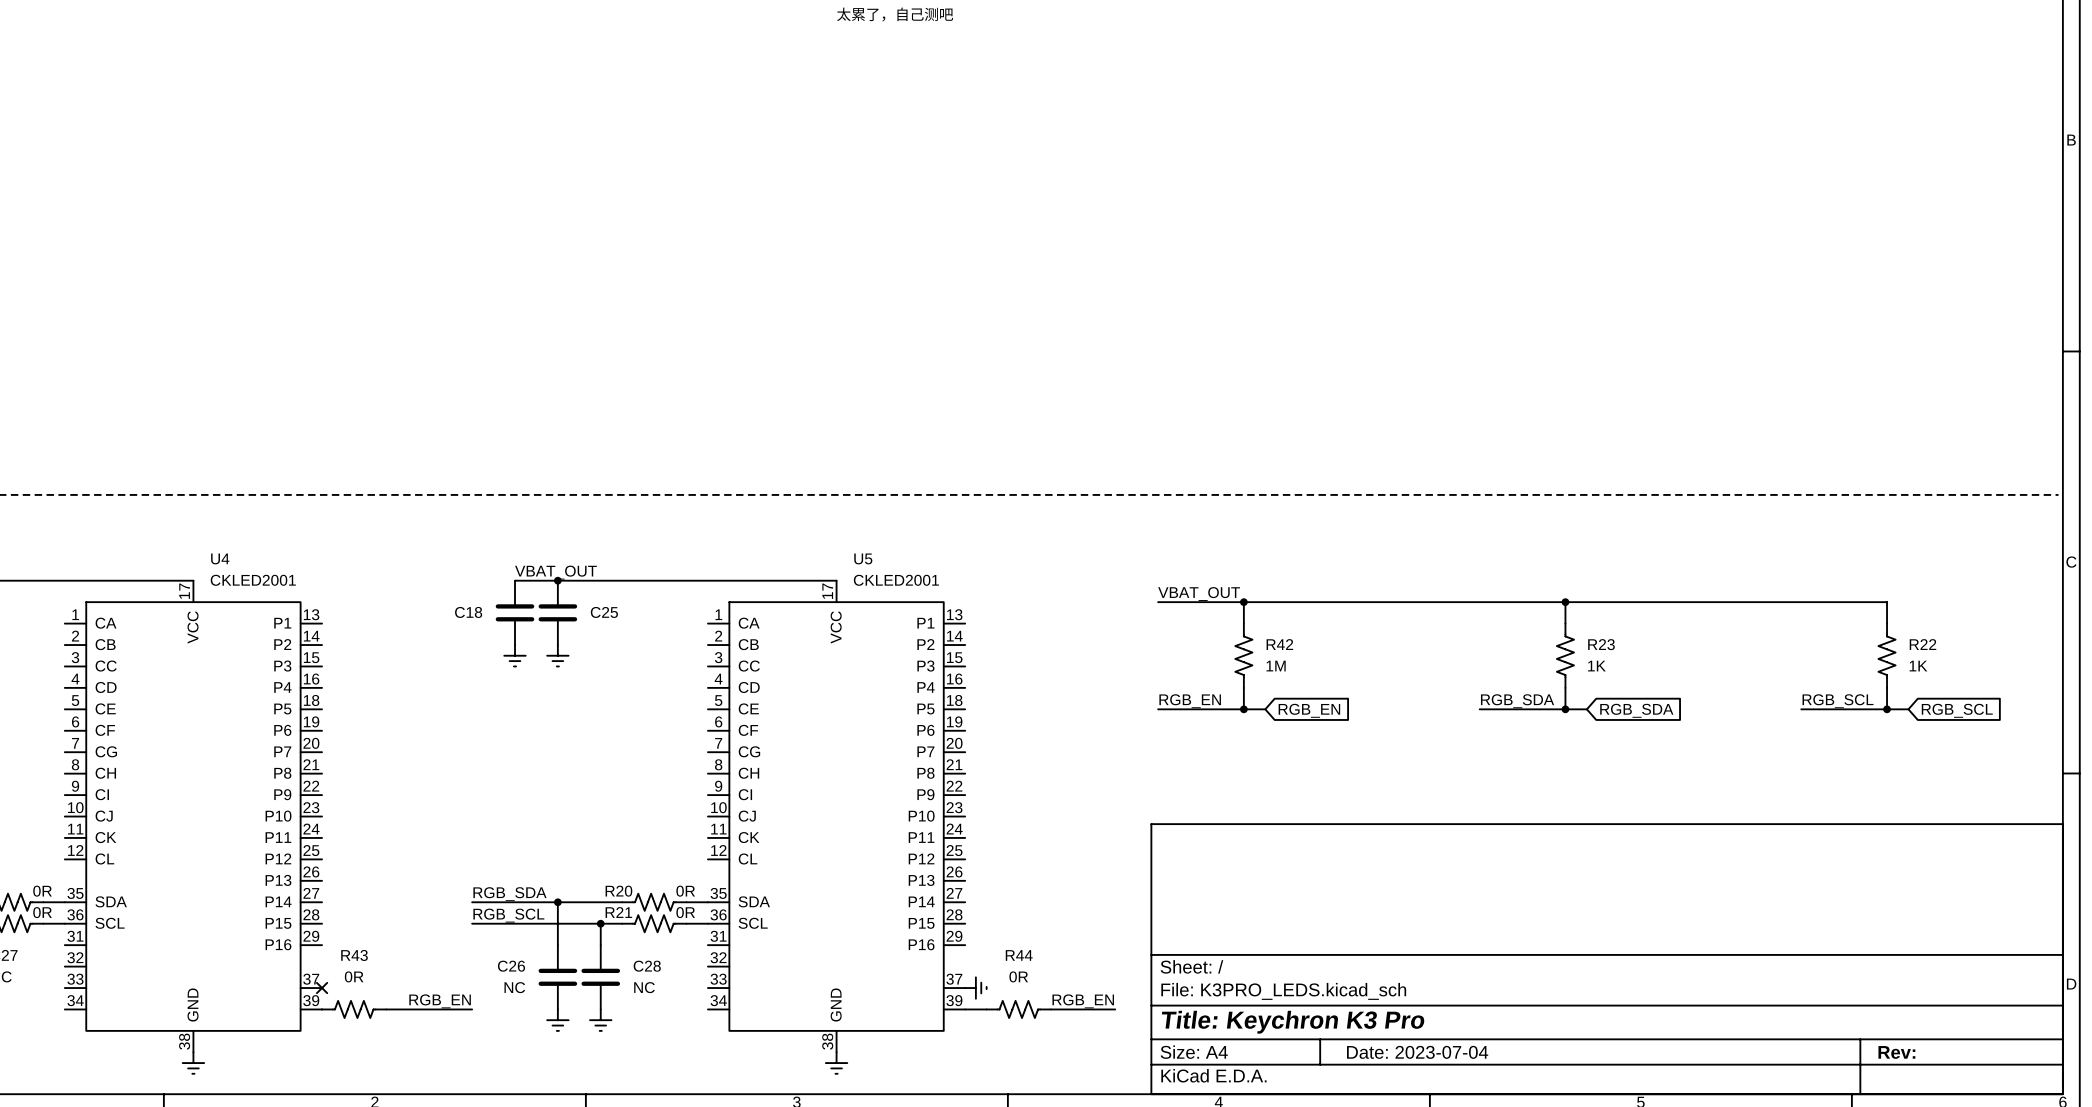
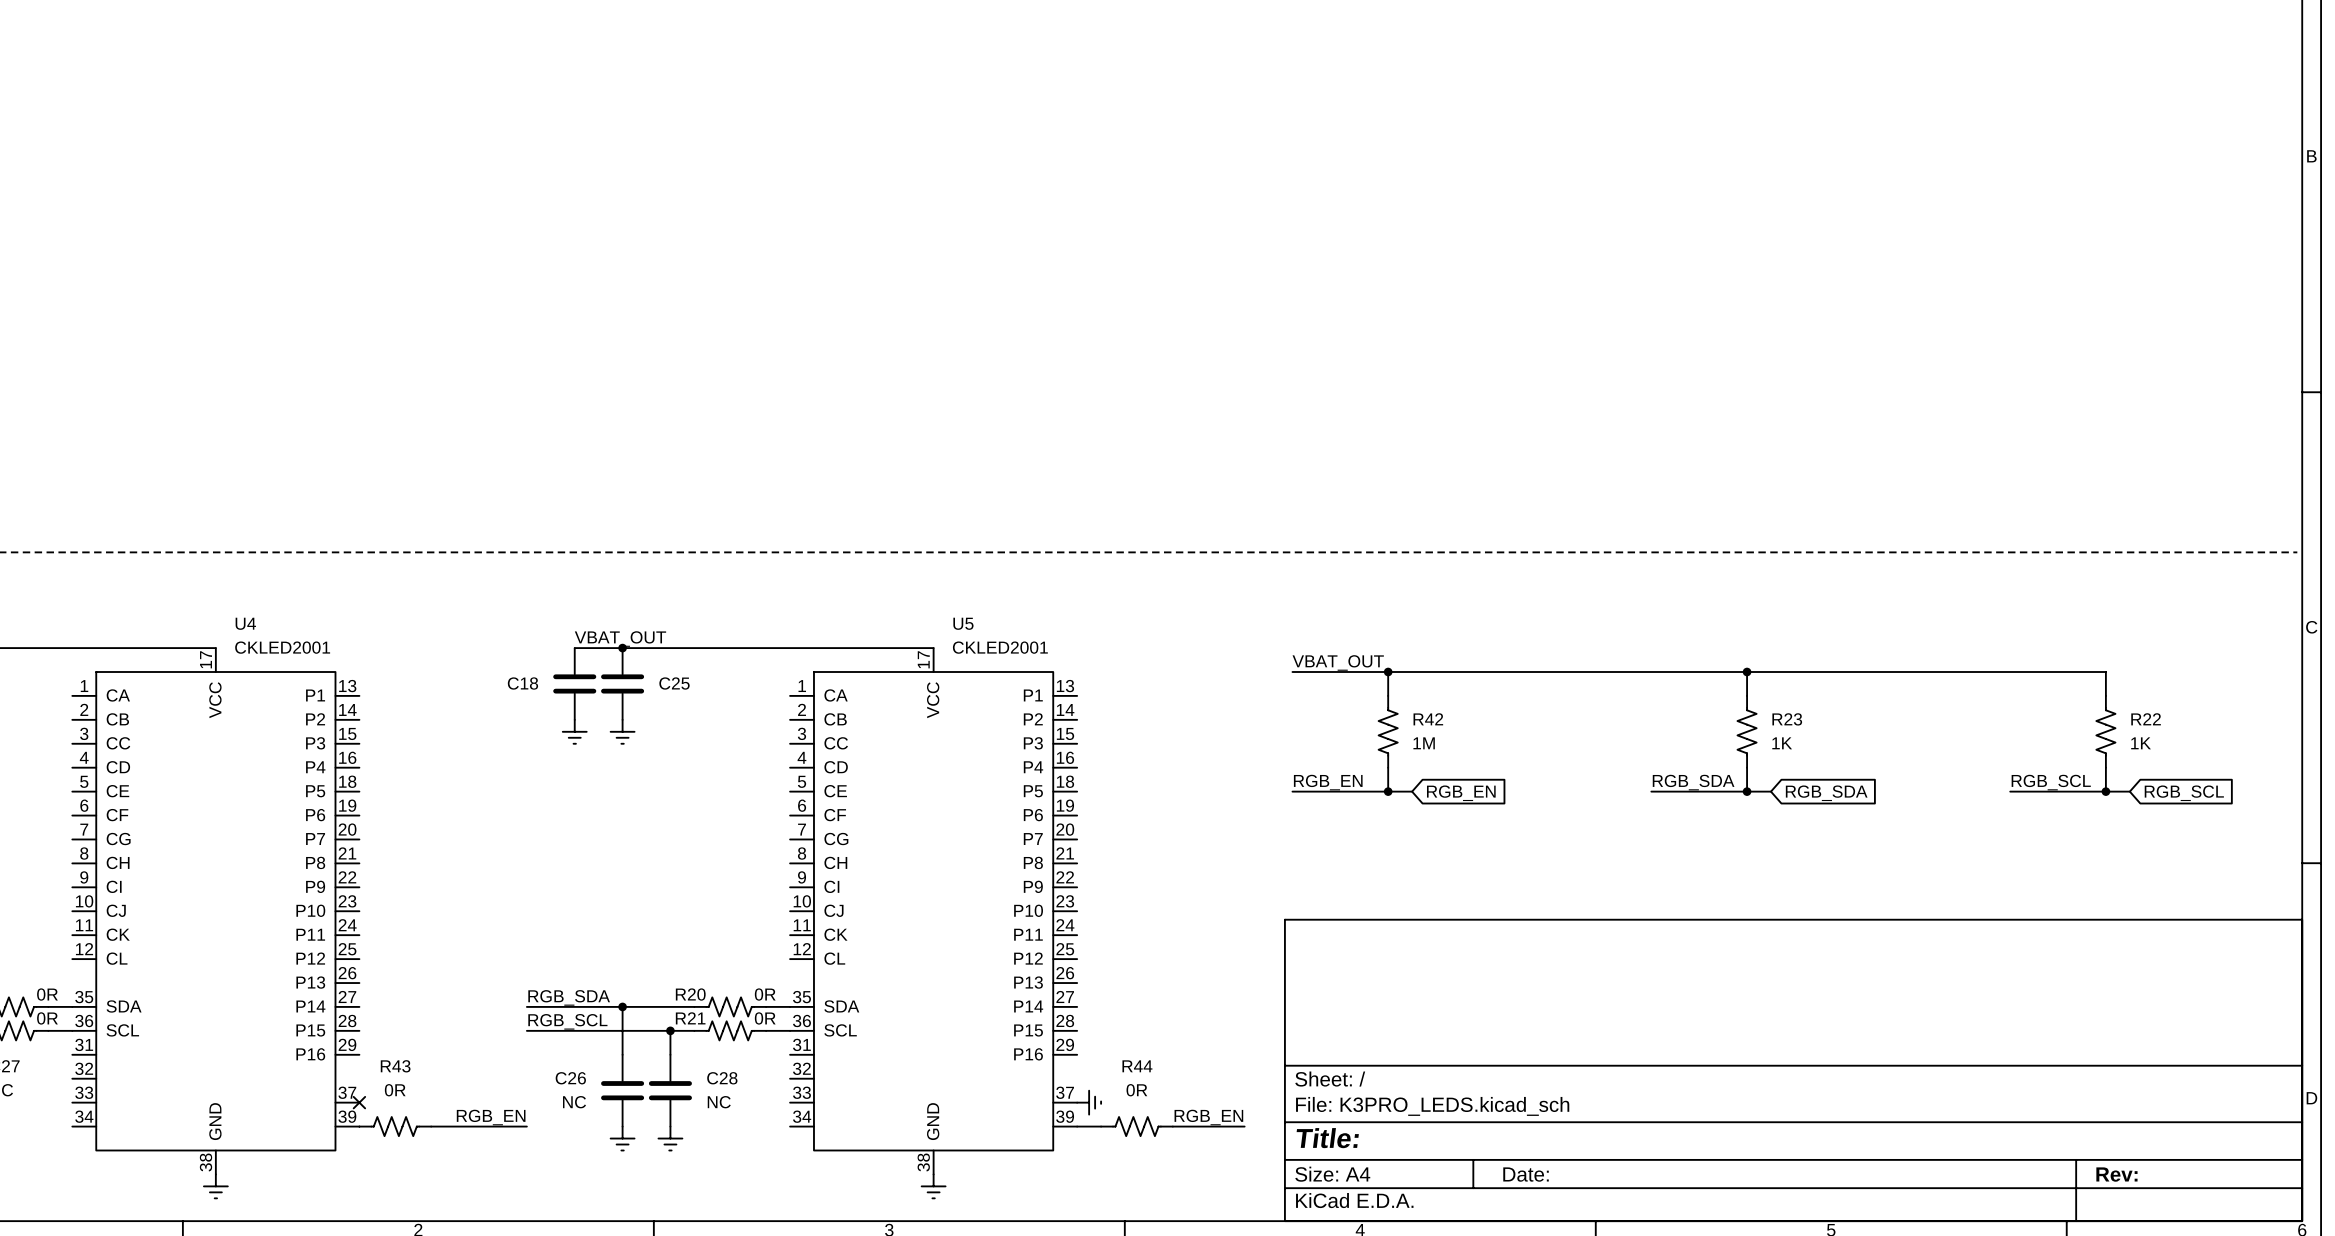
text: 太累了，自己测吧 (895, 14) -> none
title block: Title: Keychron K3 Pro (1293, 1022) -> Title: (1327, 1138)
title block: Date: 2023-07-04 (1417, 1052) -> Date: (1526, 1174)

